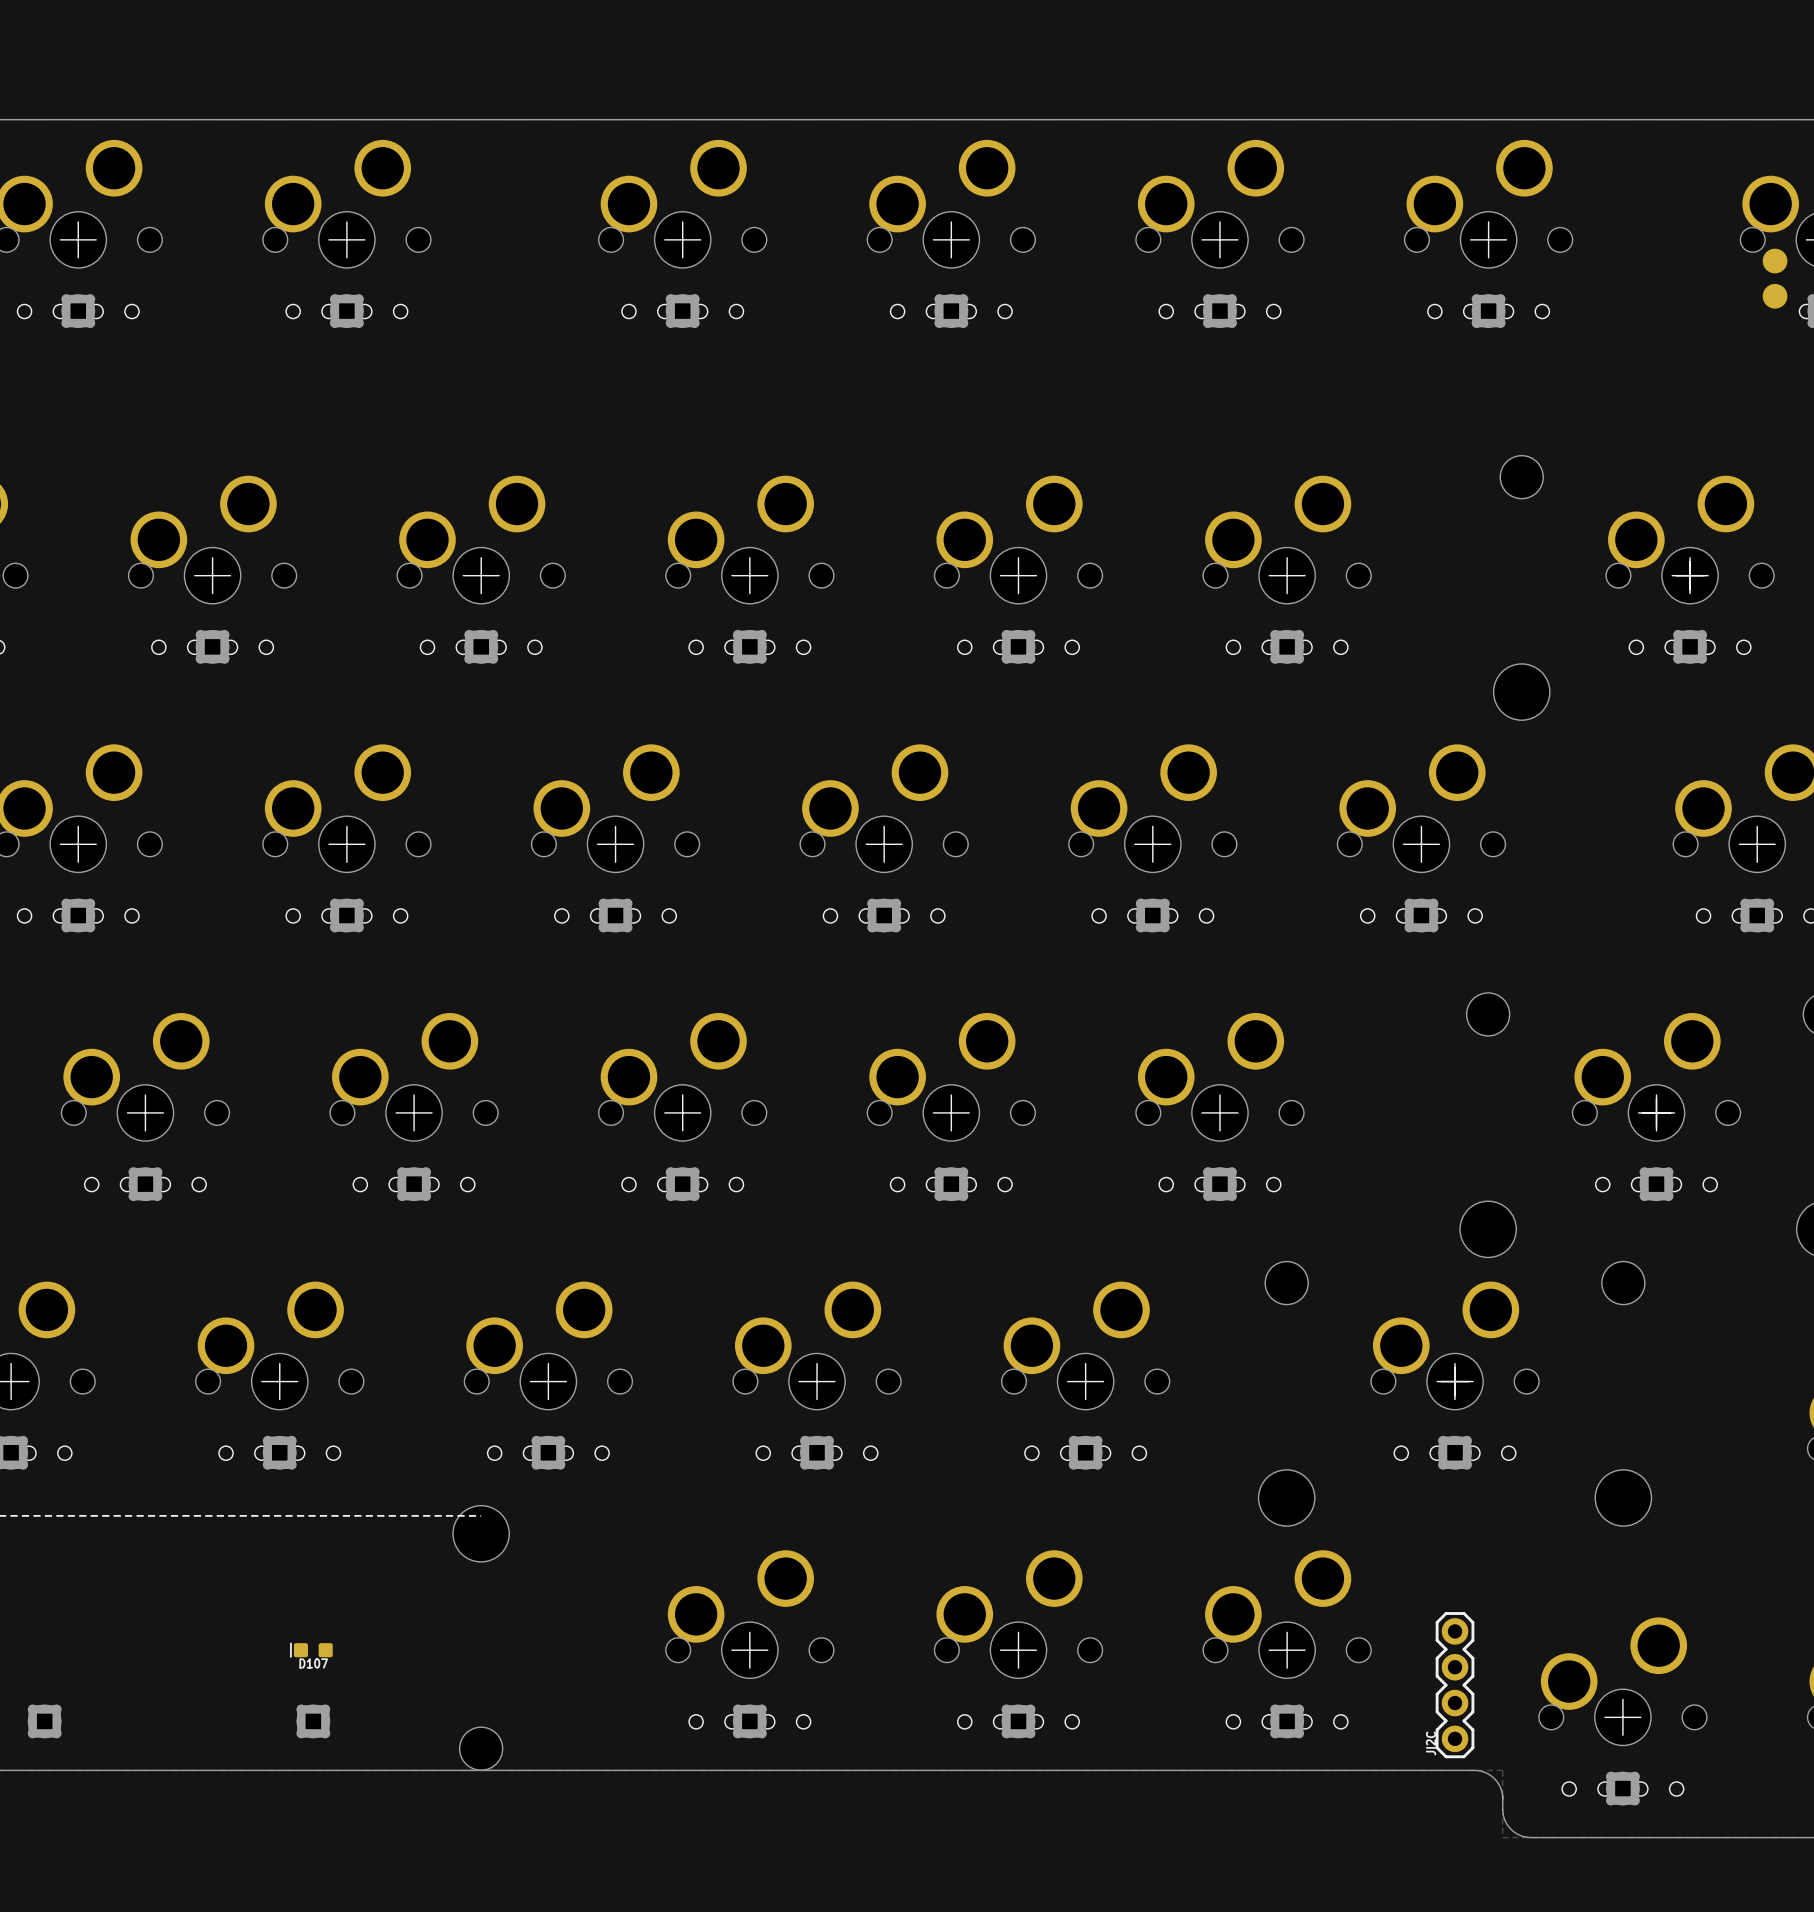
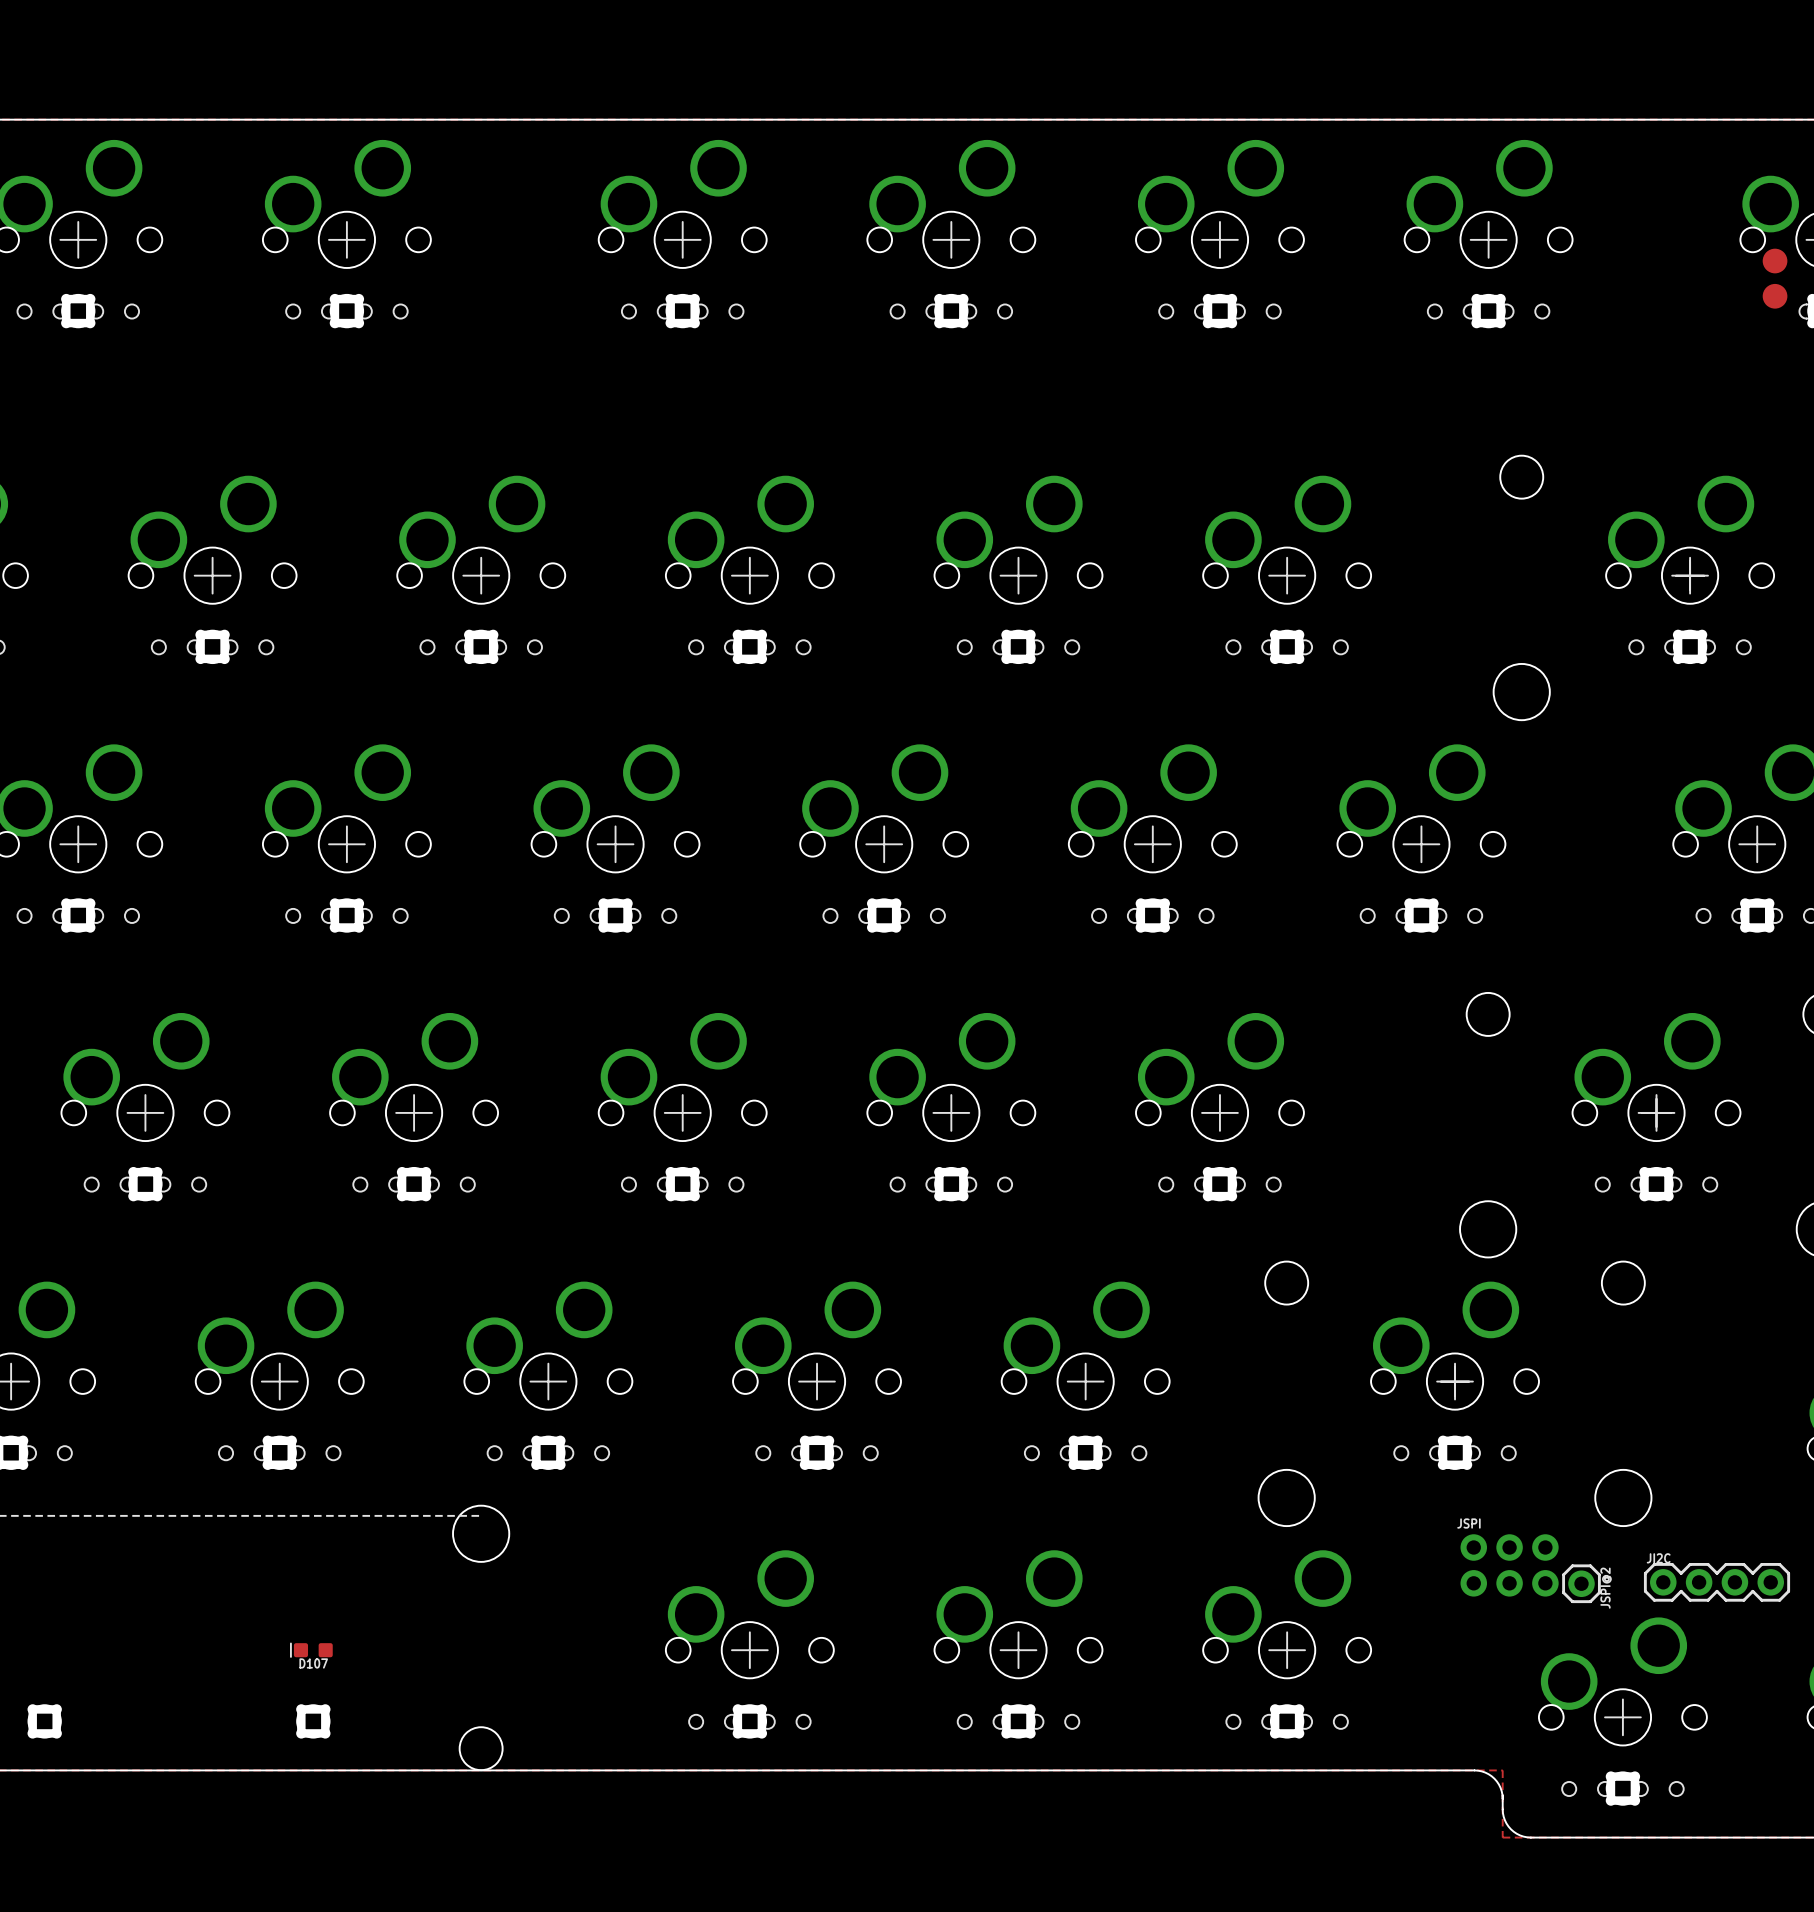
JSPI: none -> (1509, 1565)
JSPI@2: none -> (1581, 1583)
JI2C rotation: 0° (1455, 1685) -> 90° clockwise (1717, 1582)
JI2C position: (1455, 1685) -> (1717, 1582)

